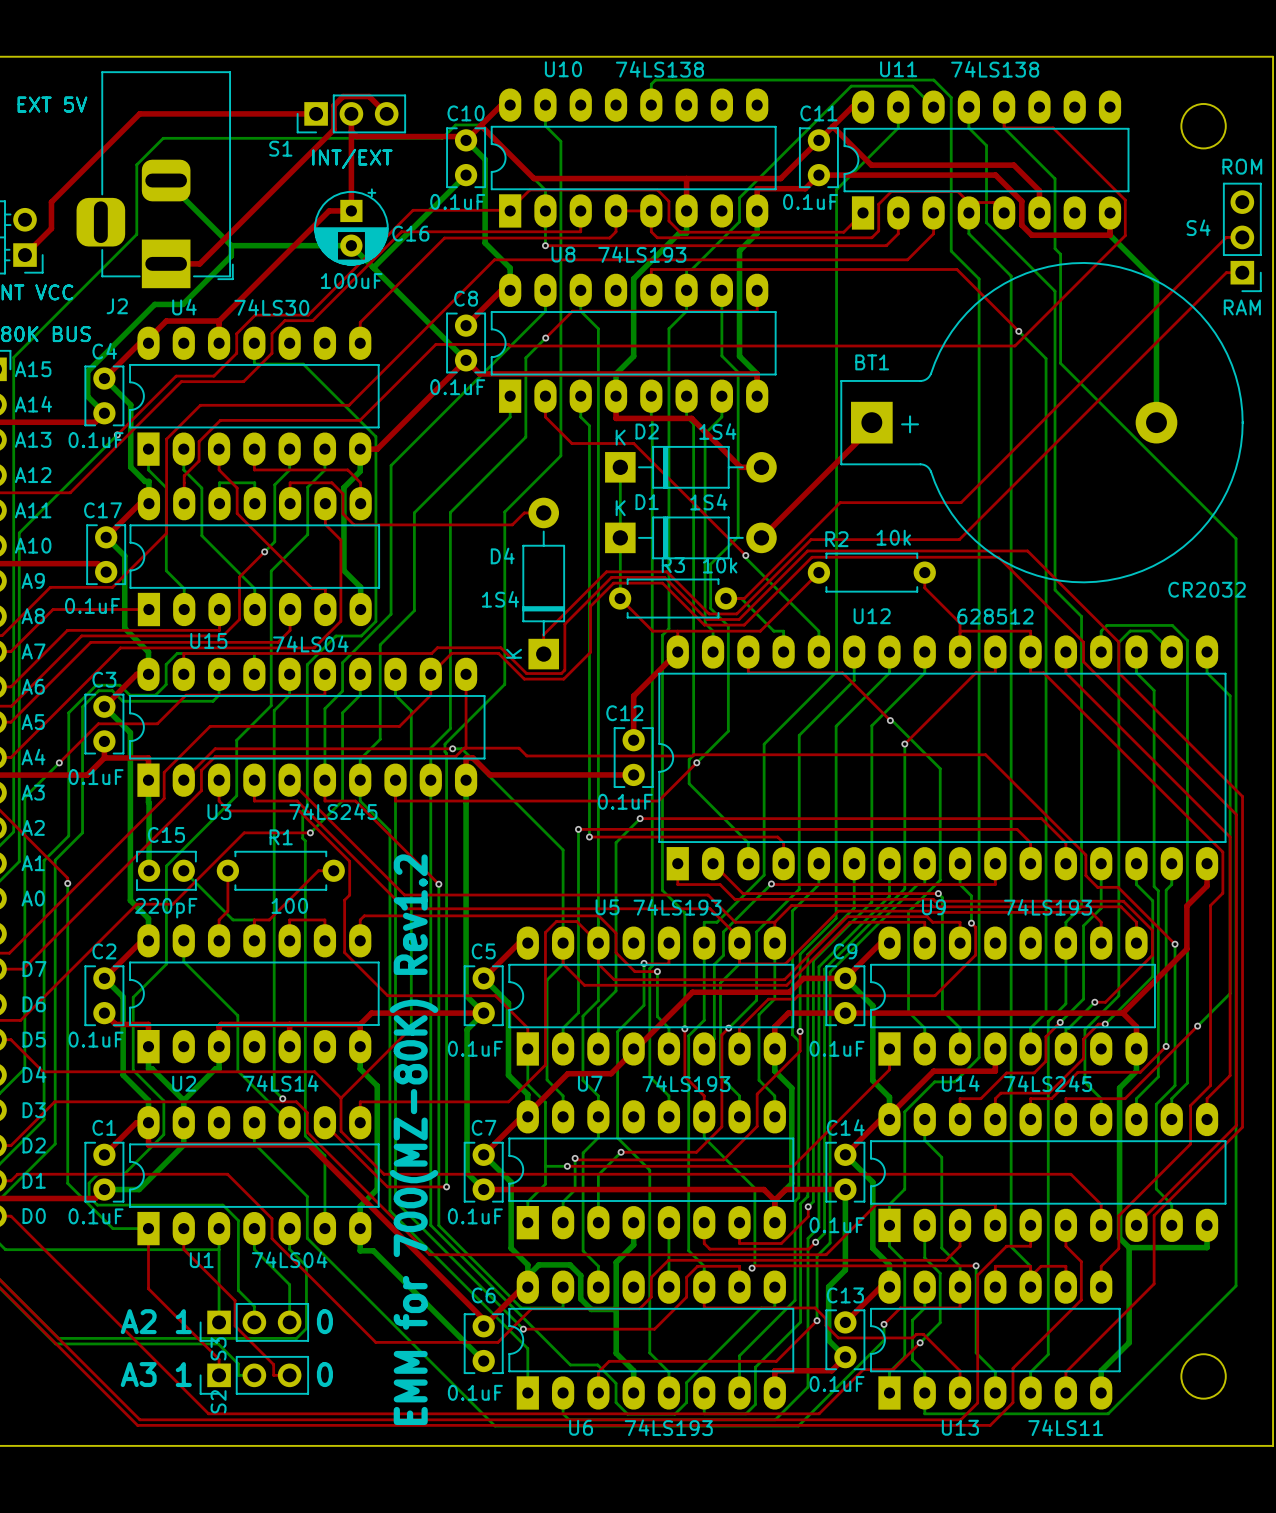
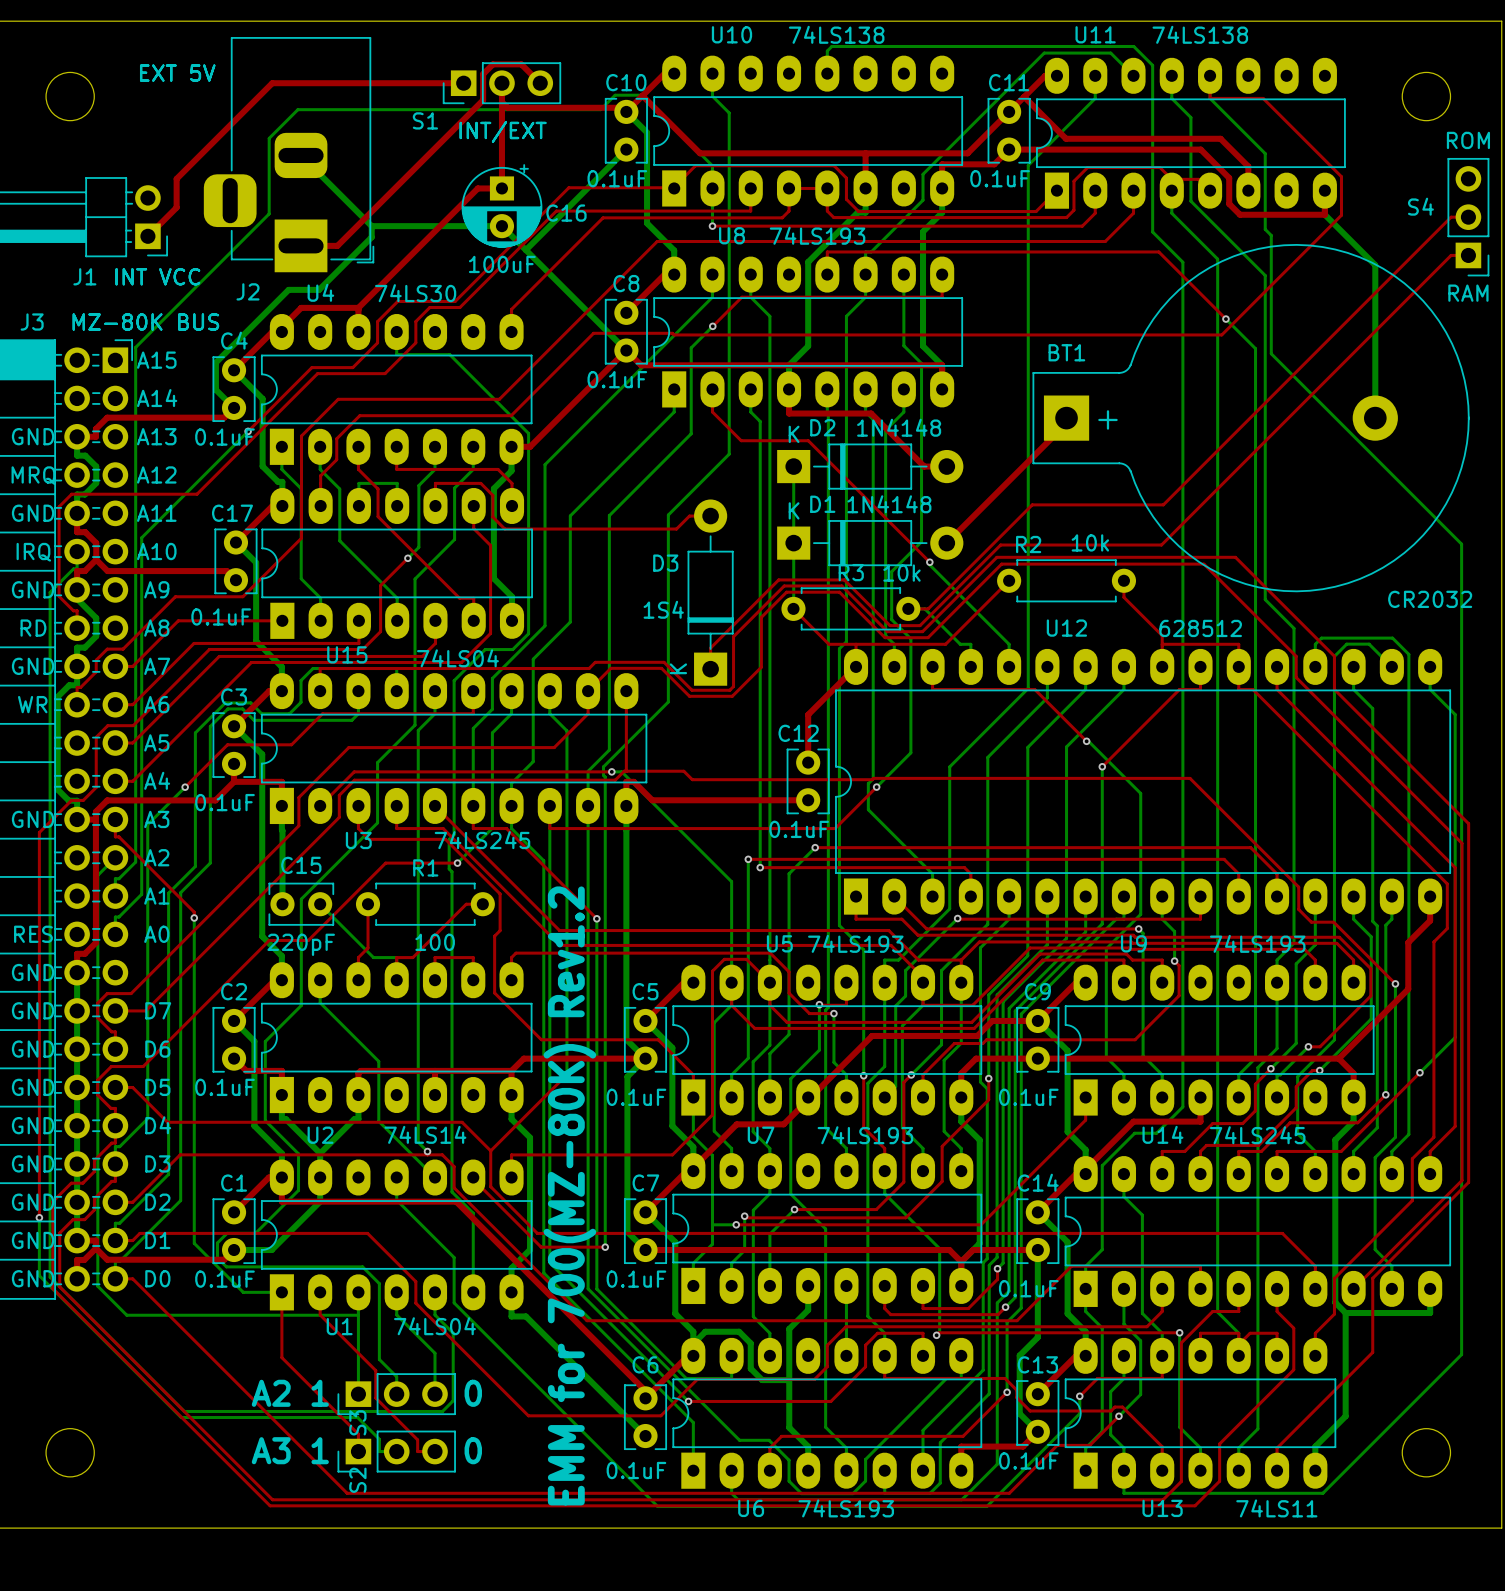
text: 1S4 (717, 431) -> 1N4148 (899, 427)
text: 1S4 (708, 502) -> 1N4148 (889, 504)
D4 name: D4 (502, 555) -> D3 (665, 563)

